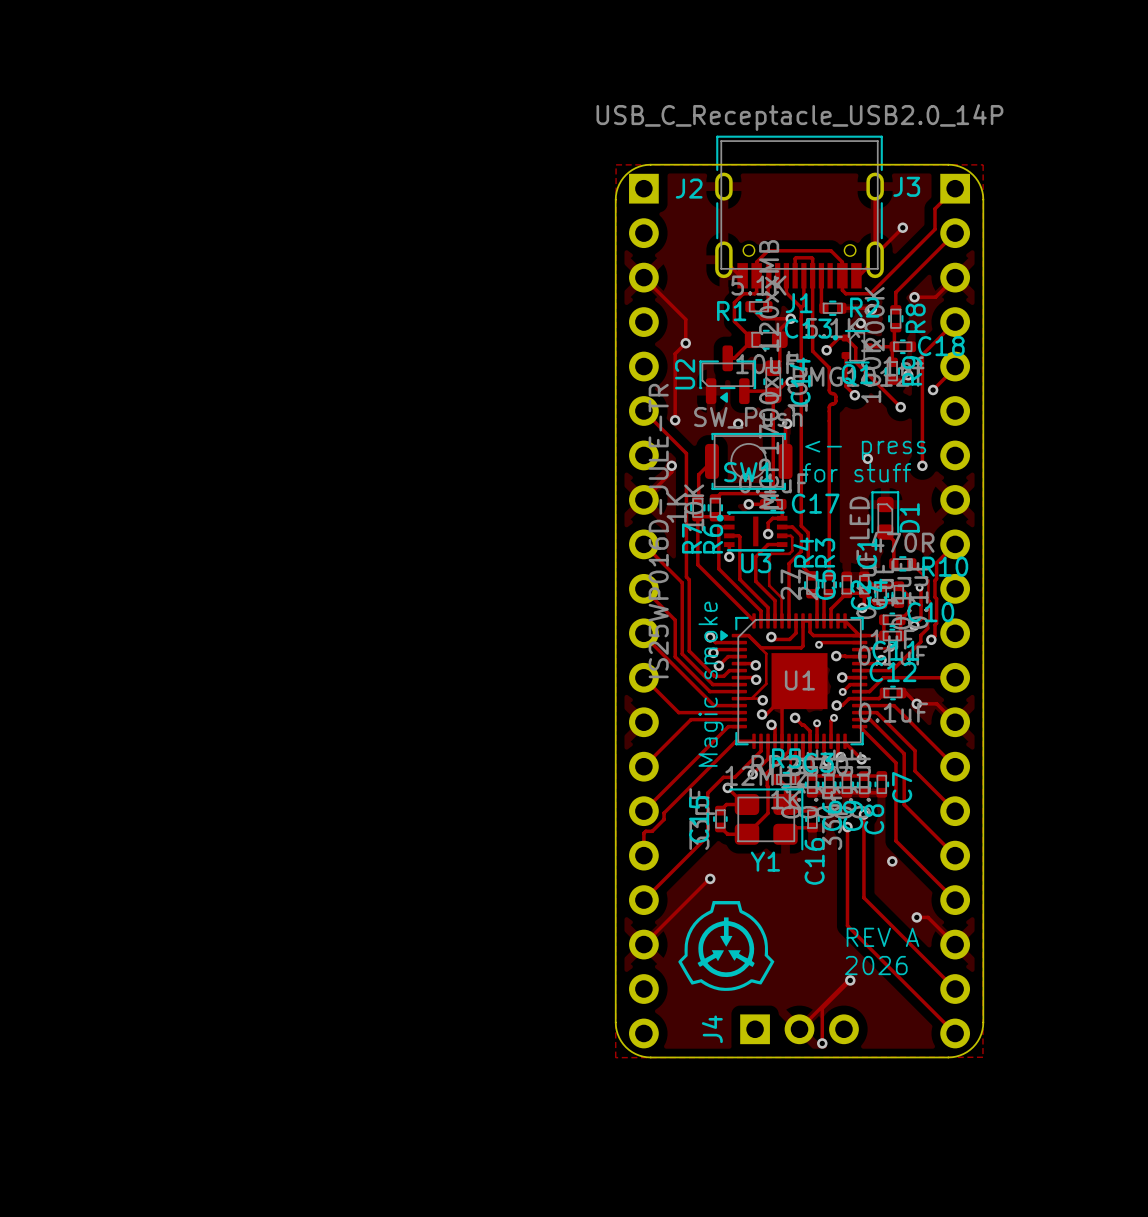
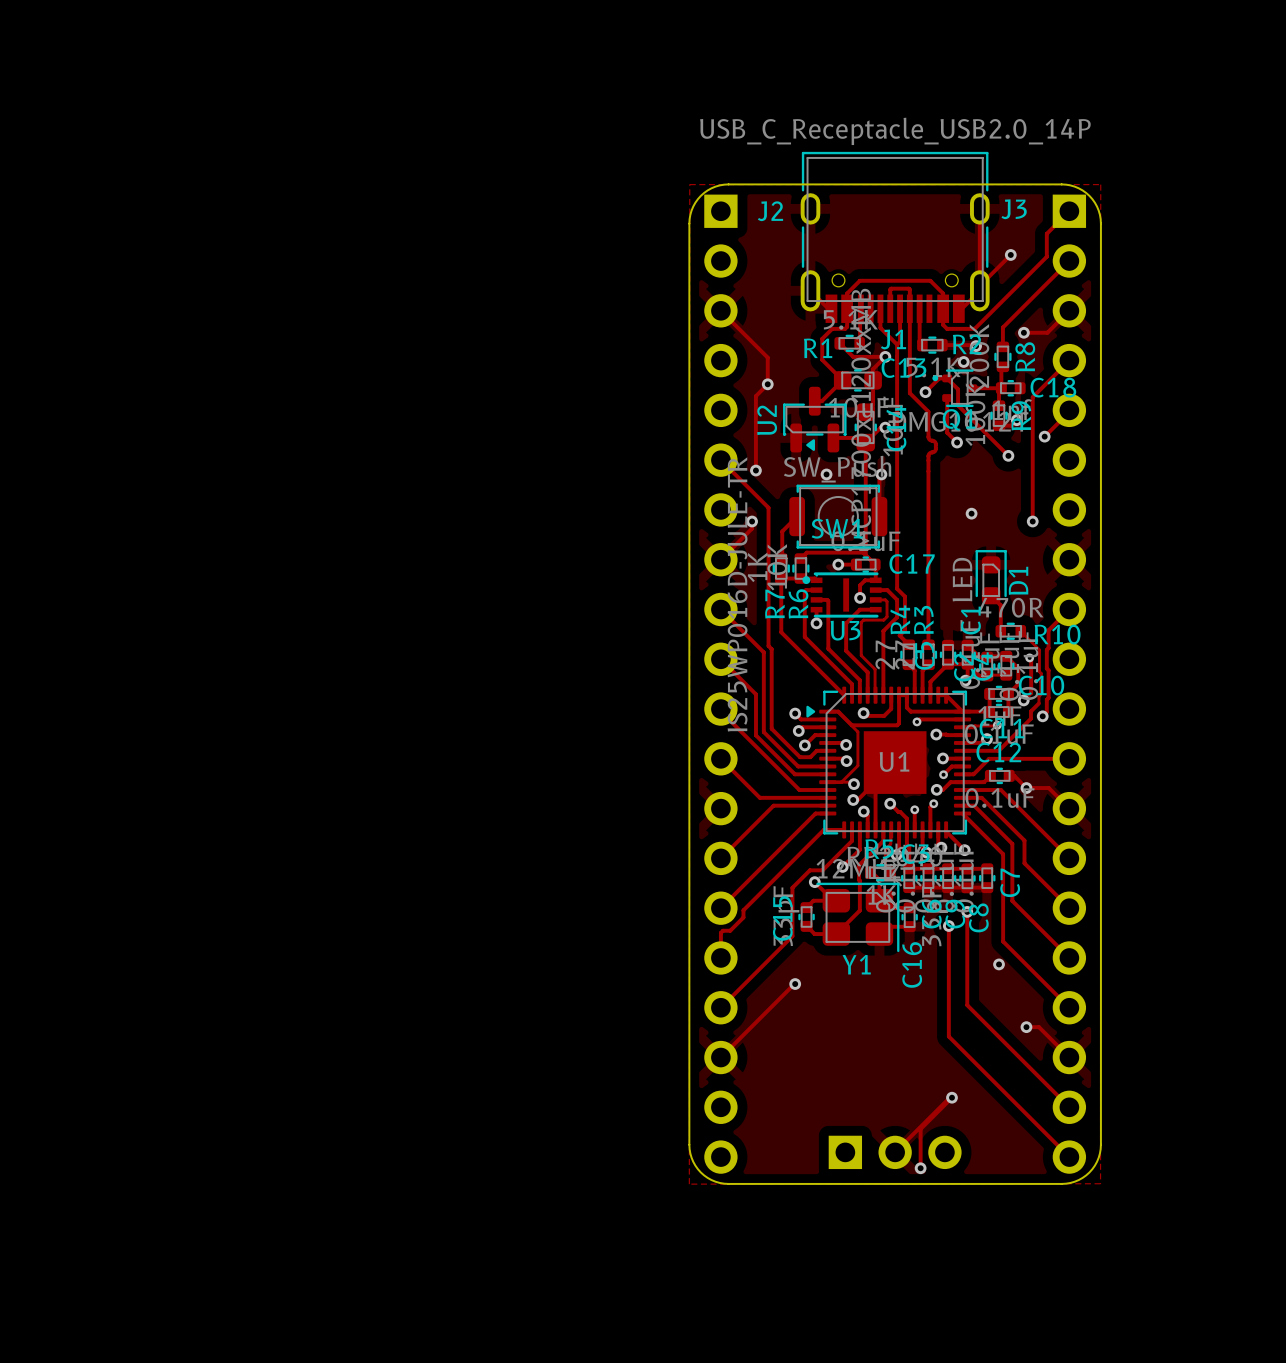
text: <- press (865, 450) -> none
text: for stuff (856, 472) -> none
text: Magic smoke (711, 684) -> none
drawing: [678, 901, 775, 991] -> none
text: REV A (882, 937) -> none
text: 2026 (876, 965) -> none
J4 name: J4 (712, 1029) -> none

